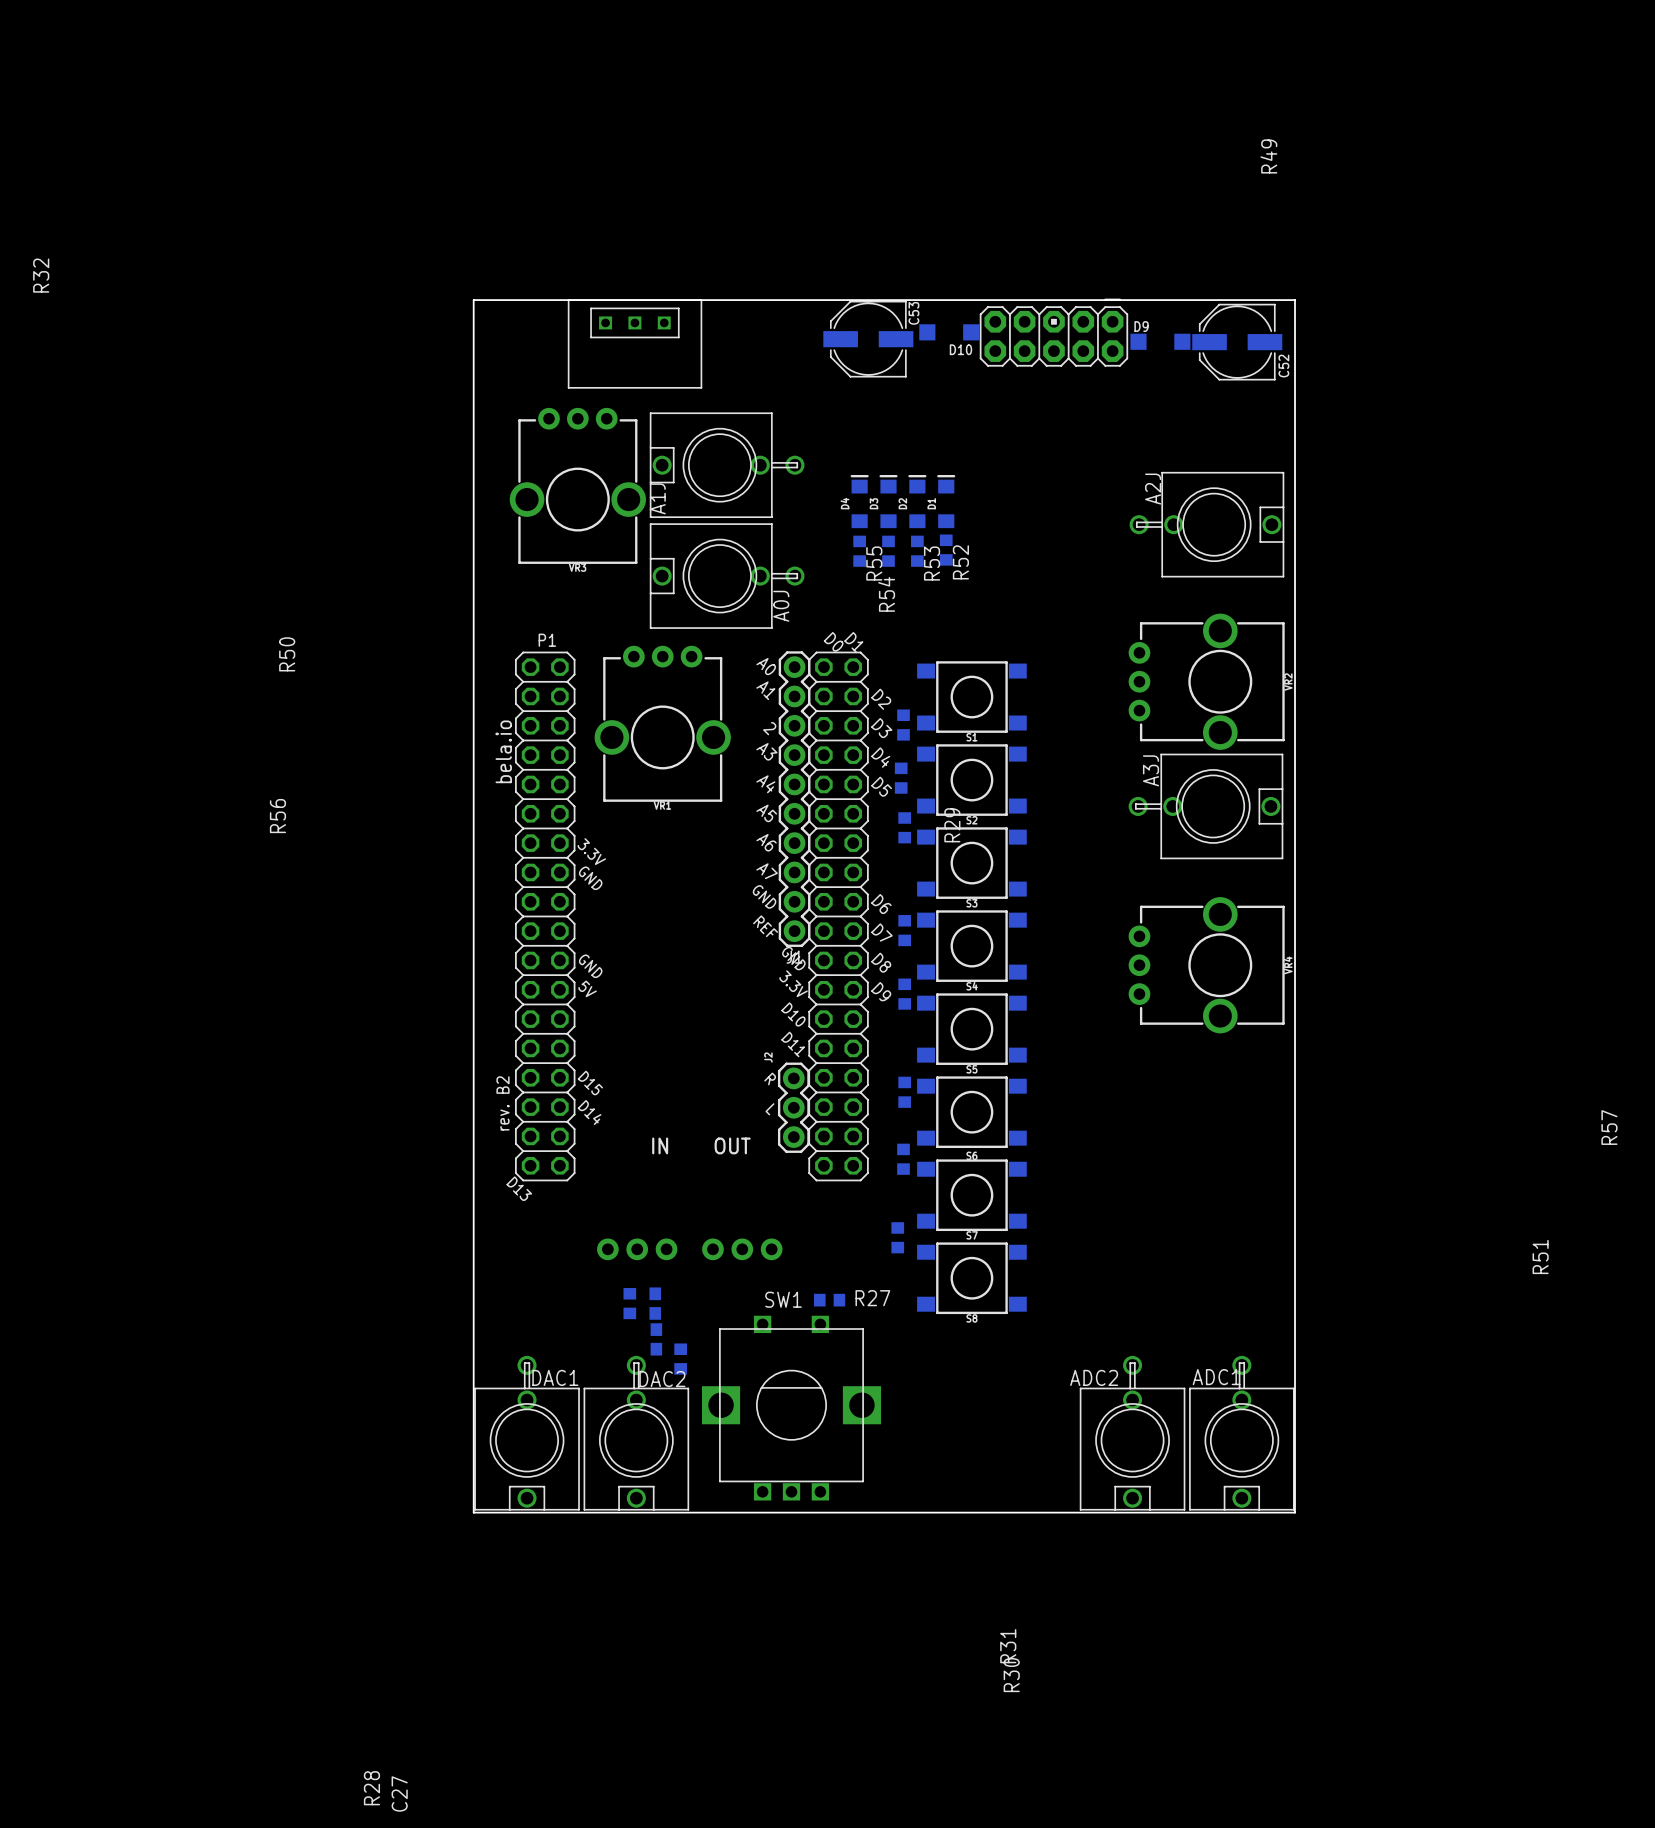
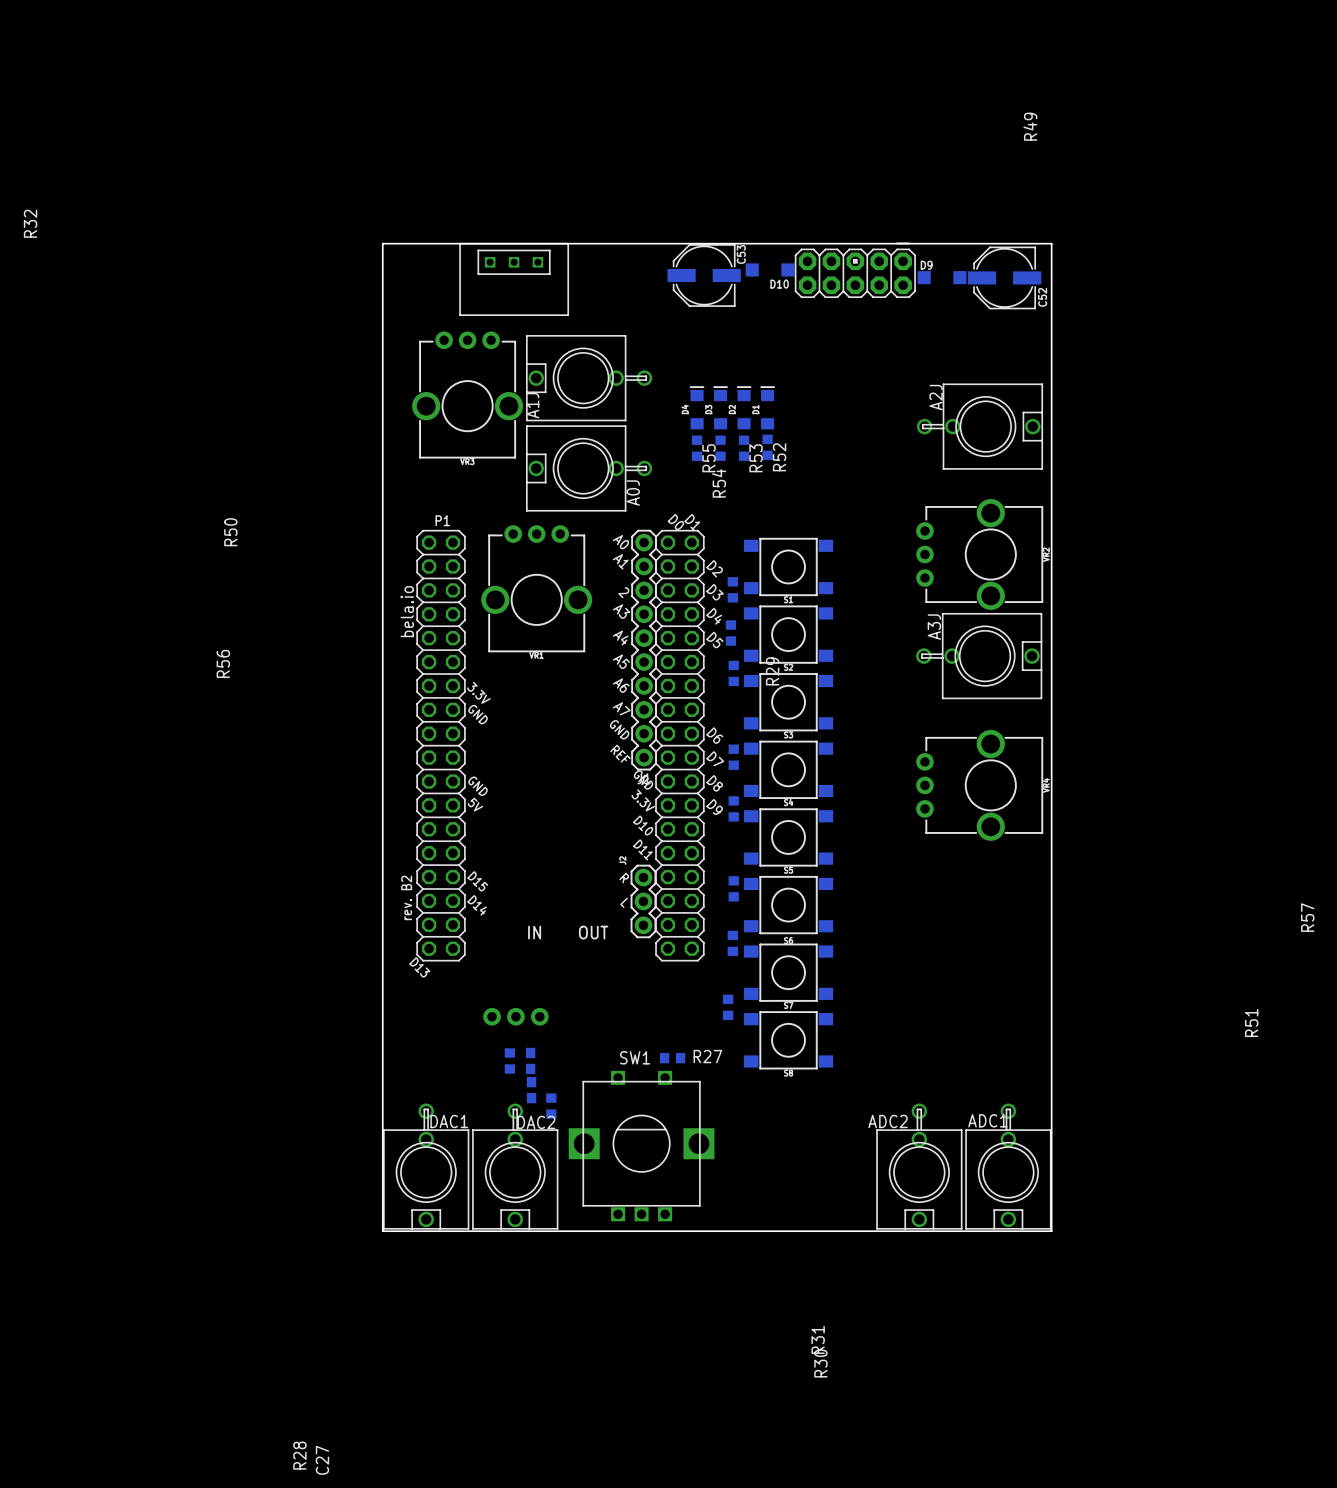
part: (742, 1249) -> none

